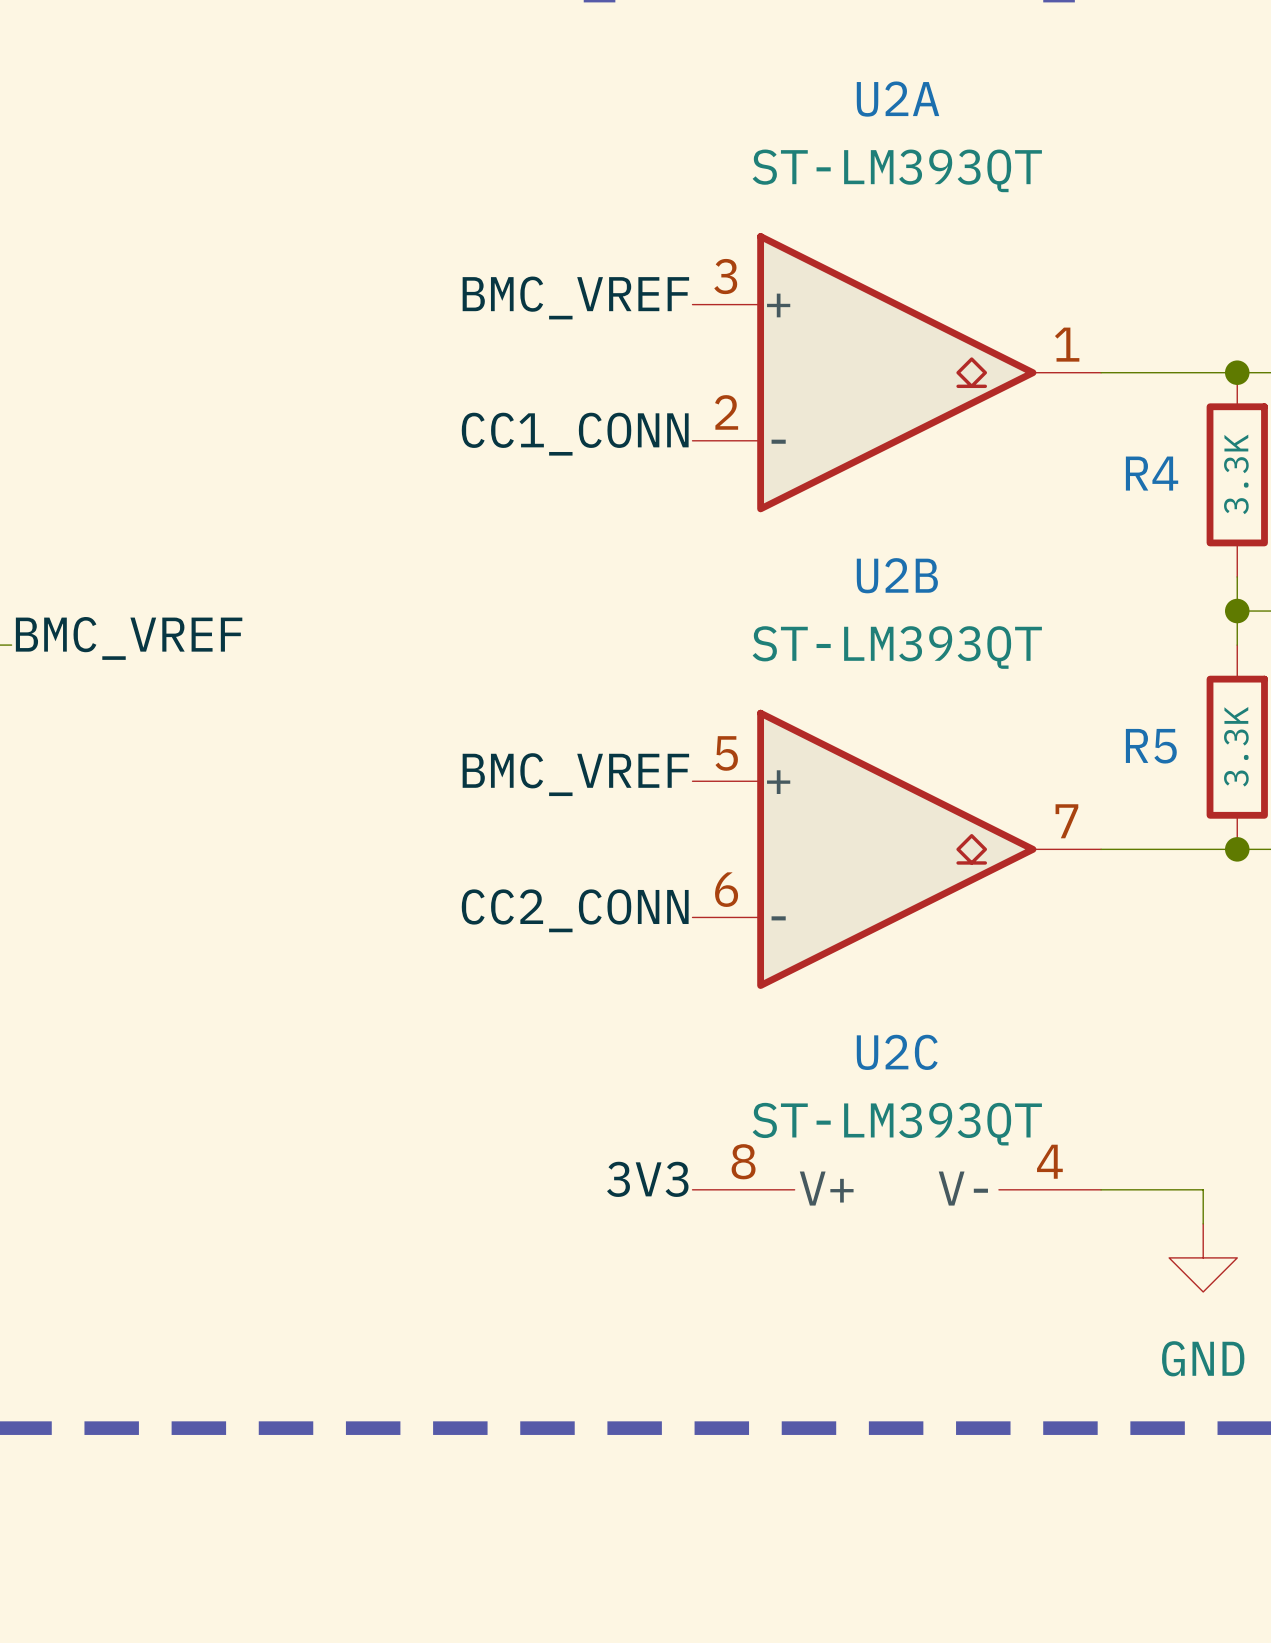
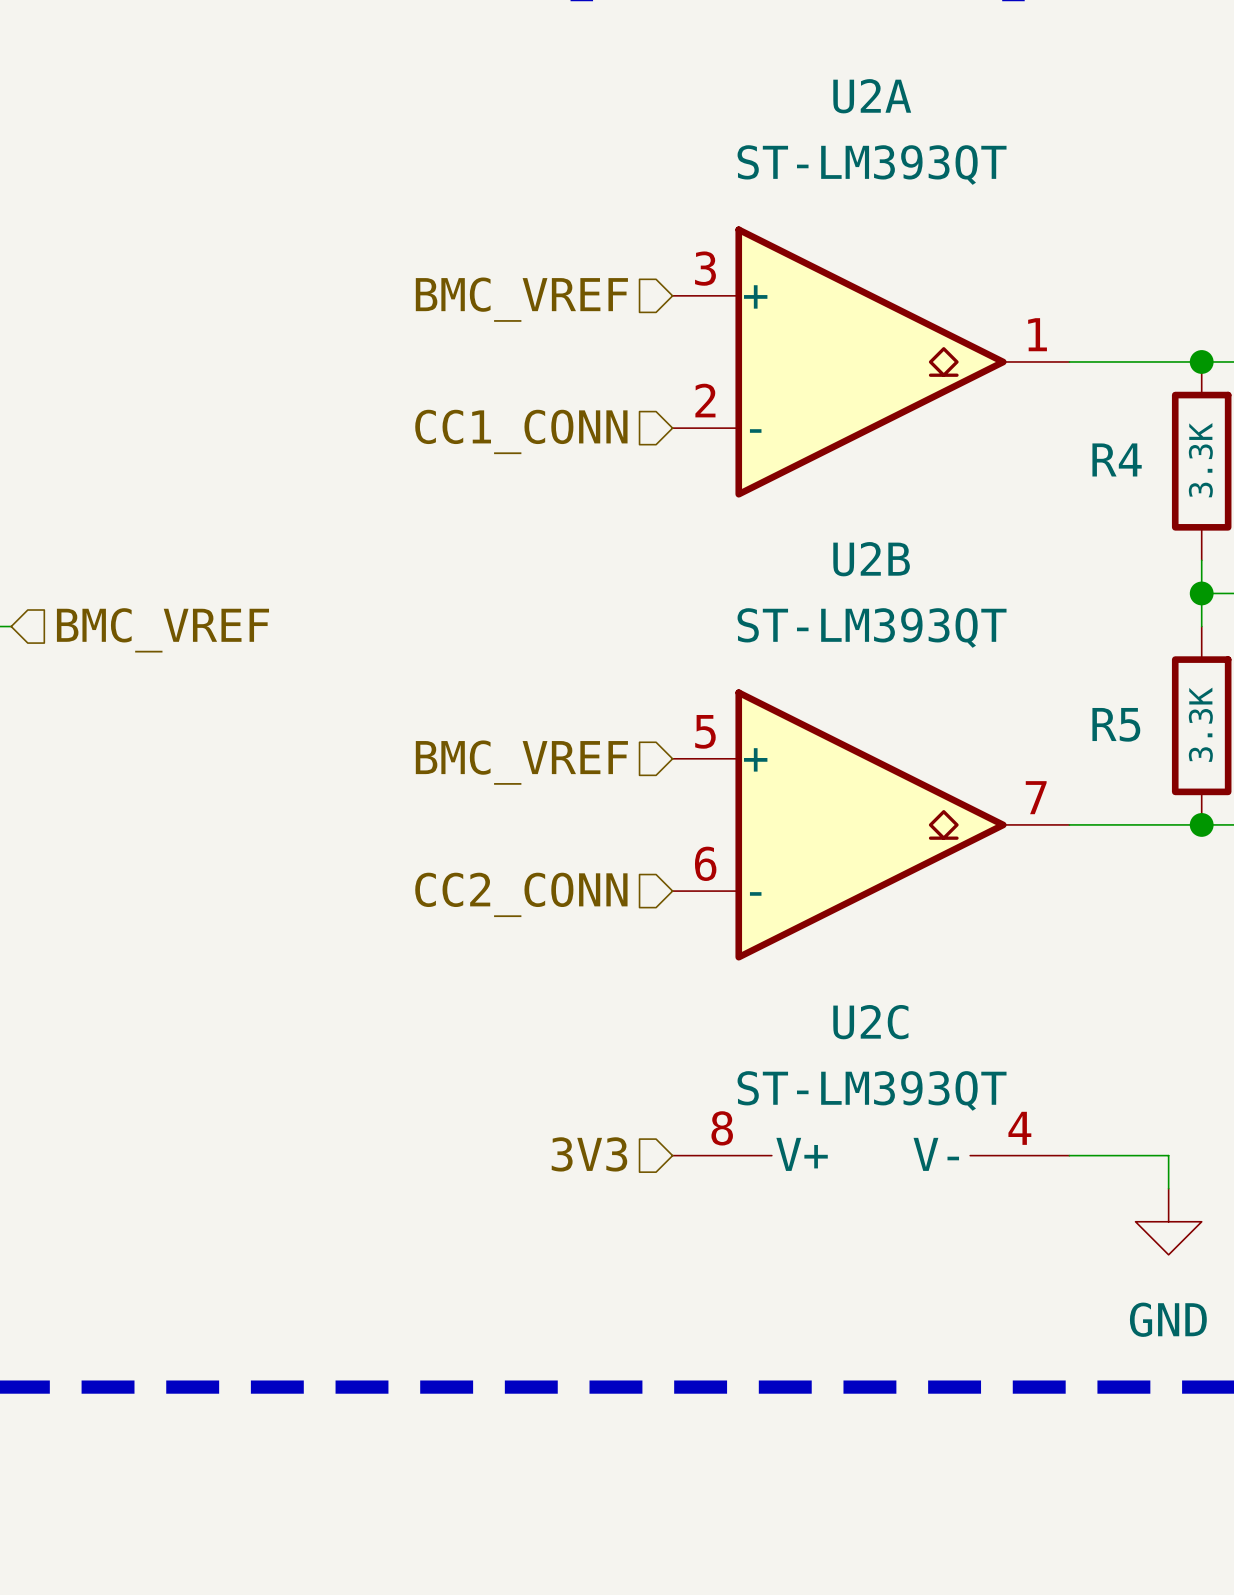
label: BMC_VREF (575, 297) -> none
hierarchical label: none -> BMC_VREF (521, 299)
label: CC1_CONN (575, 434) -> none
hierarchical label: none -> CC1_CONN (521, 431)
label: BMC_VREF (129, 638) -> none
hierarchical label: none -> BMC_VREF (162, 630)
label: BMC_VREF (575, 774) -> none
hierarchical label: none -> BMC_VREF (521, 762)
label: CC2_CONN (575, 910) -> none
hierarchical label: none -> CC2_CONN (521, 894)
label: 3V3 (647, 1179) -> none
hierarchical label: none -> 3V3 (589, 1154)

